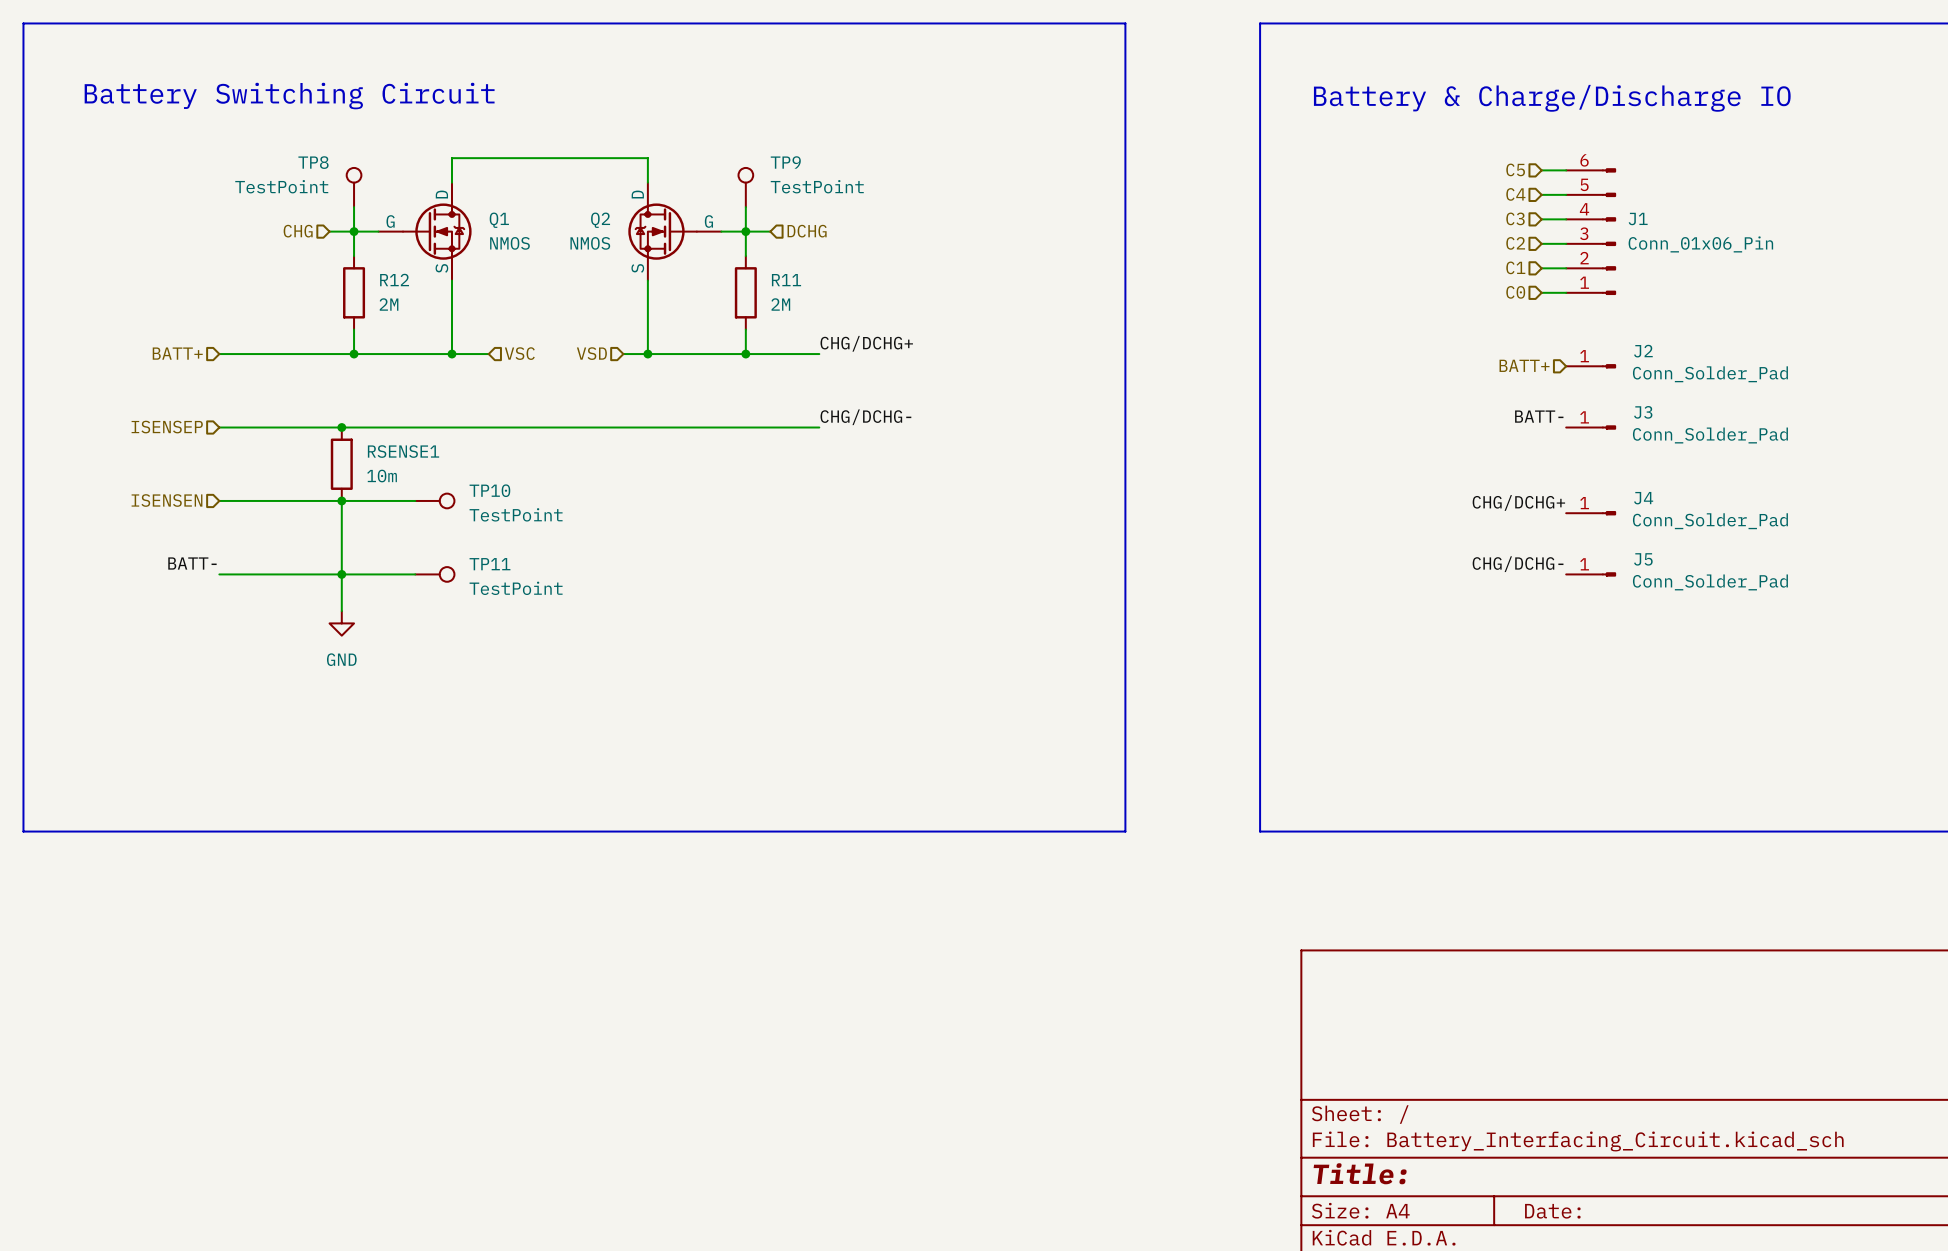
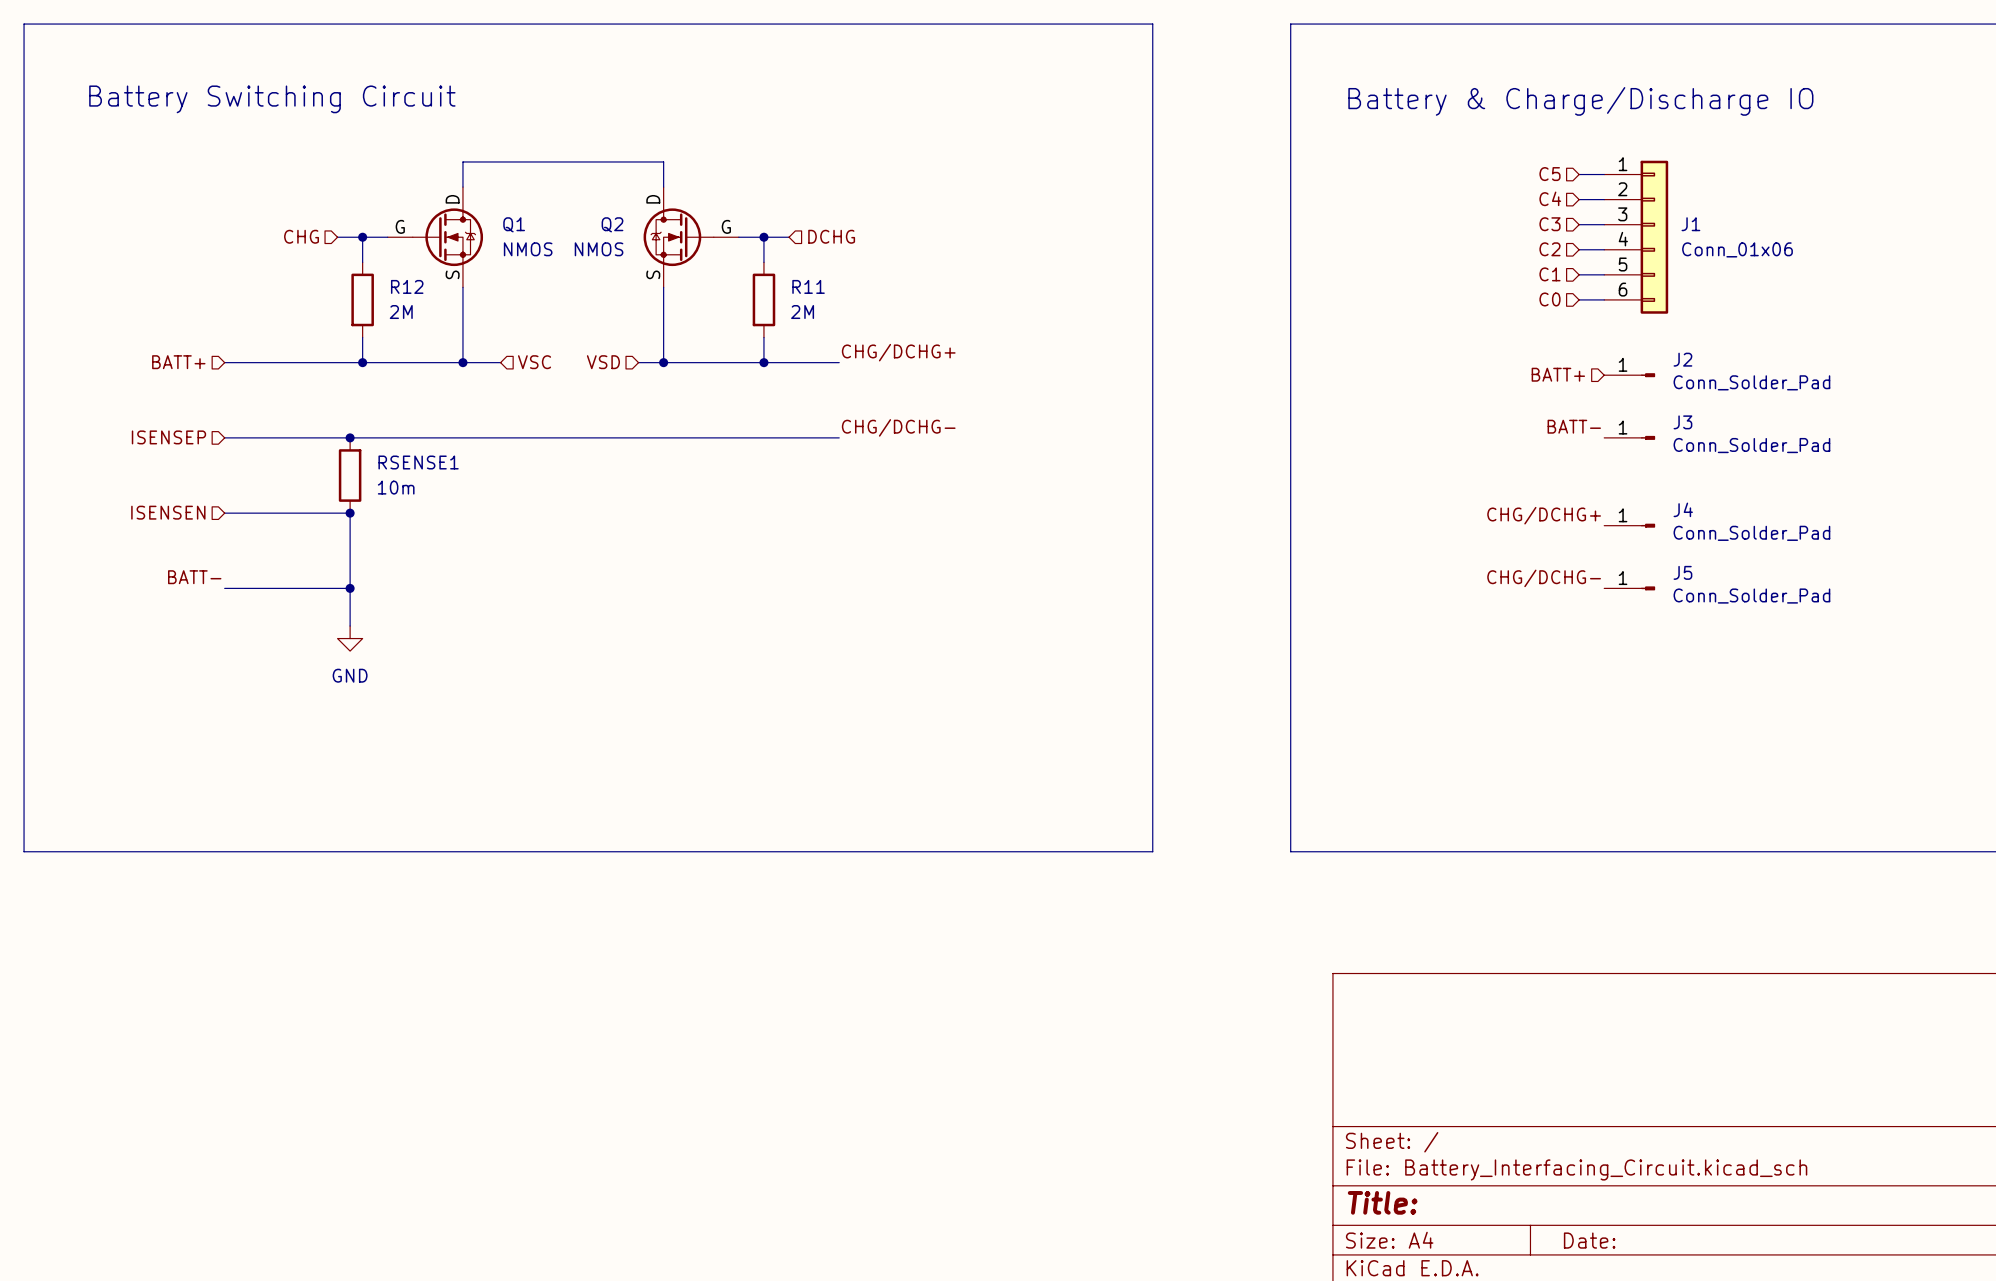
J1 symbol: [1566, 168, 1616, 295] -> [1604, 160, 1669, 314]
TP8: TestPoint (354, 187) -> none
TP9: TestPoint (745, 187) -> none
wire: (354, 207) (354, 231) -> none
wire: (745, 207) (745, 231) -> none
J1 value: Conn_01x06_Pin (1700, 244) -> Conn_01x06 (1737, 249)
wire: (341, 500) (415, 500) -> none
TP10: TestPoint (434, 500) -> none
wire: (341, 574) (415, 574) -> none
TP11: TestPoint (434, 574) -> none

